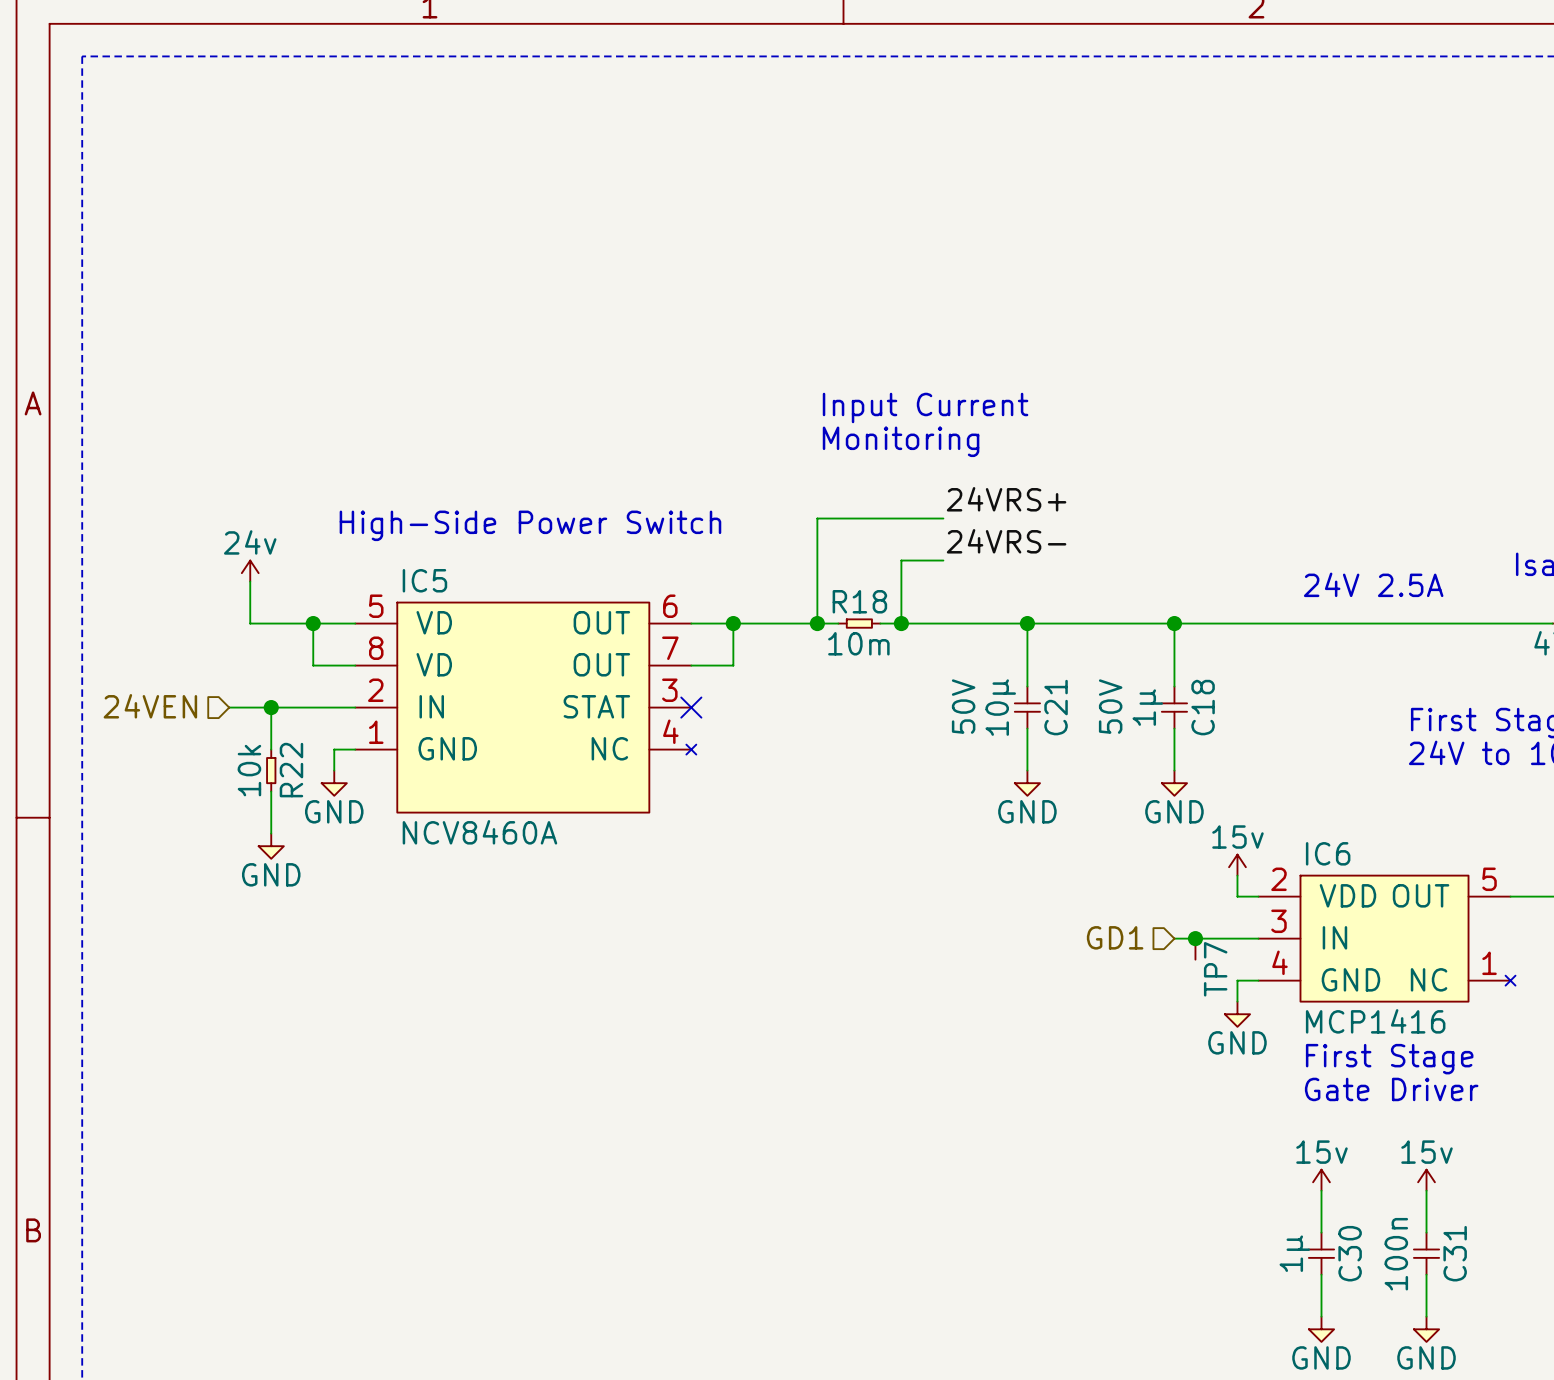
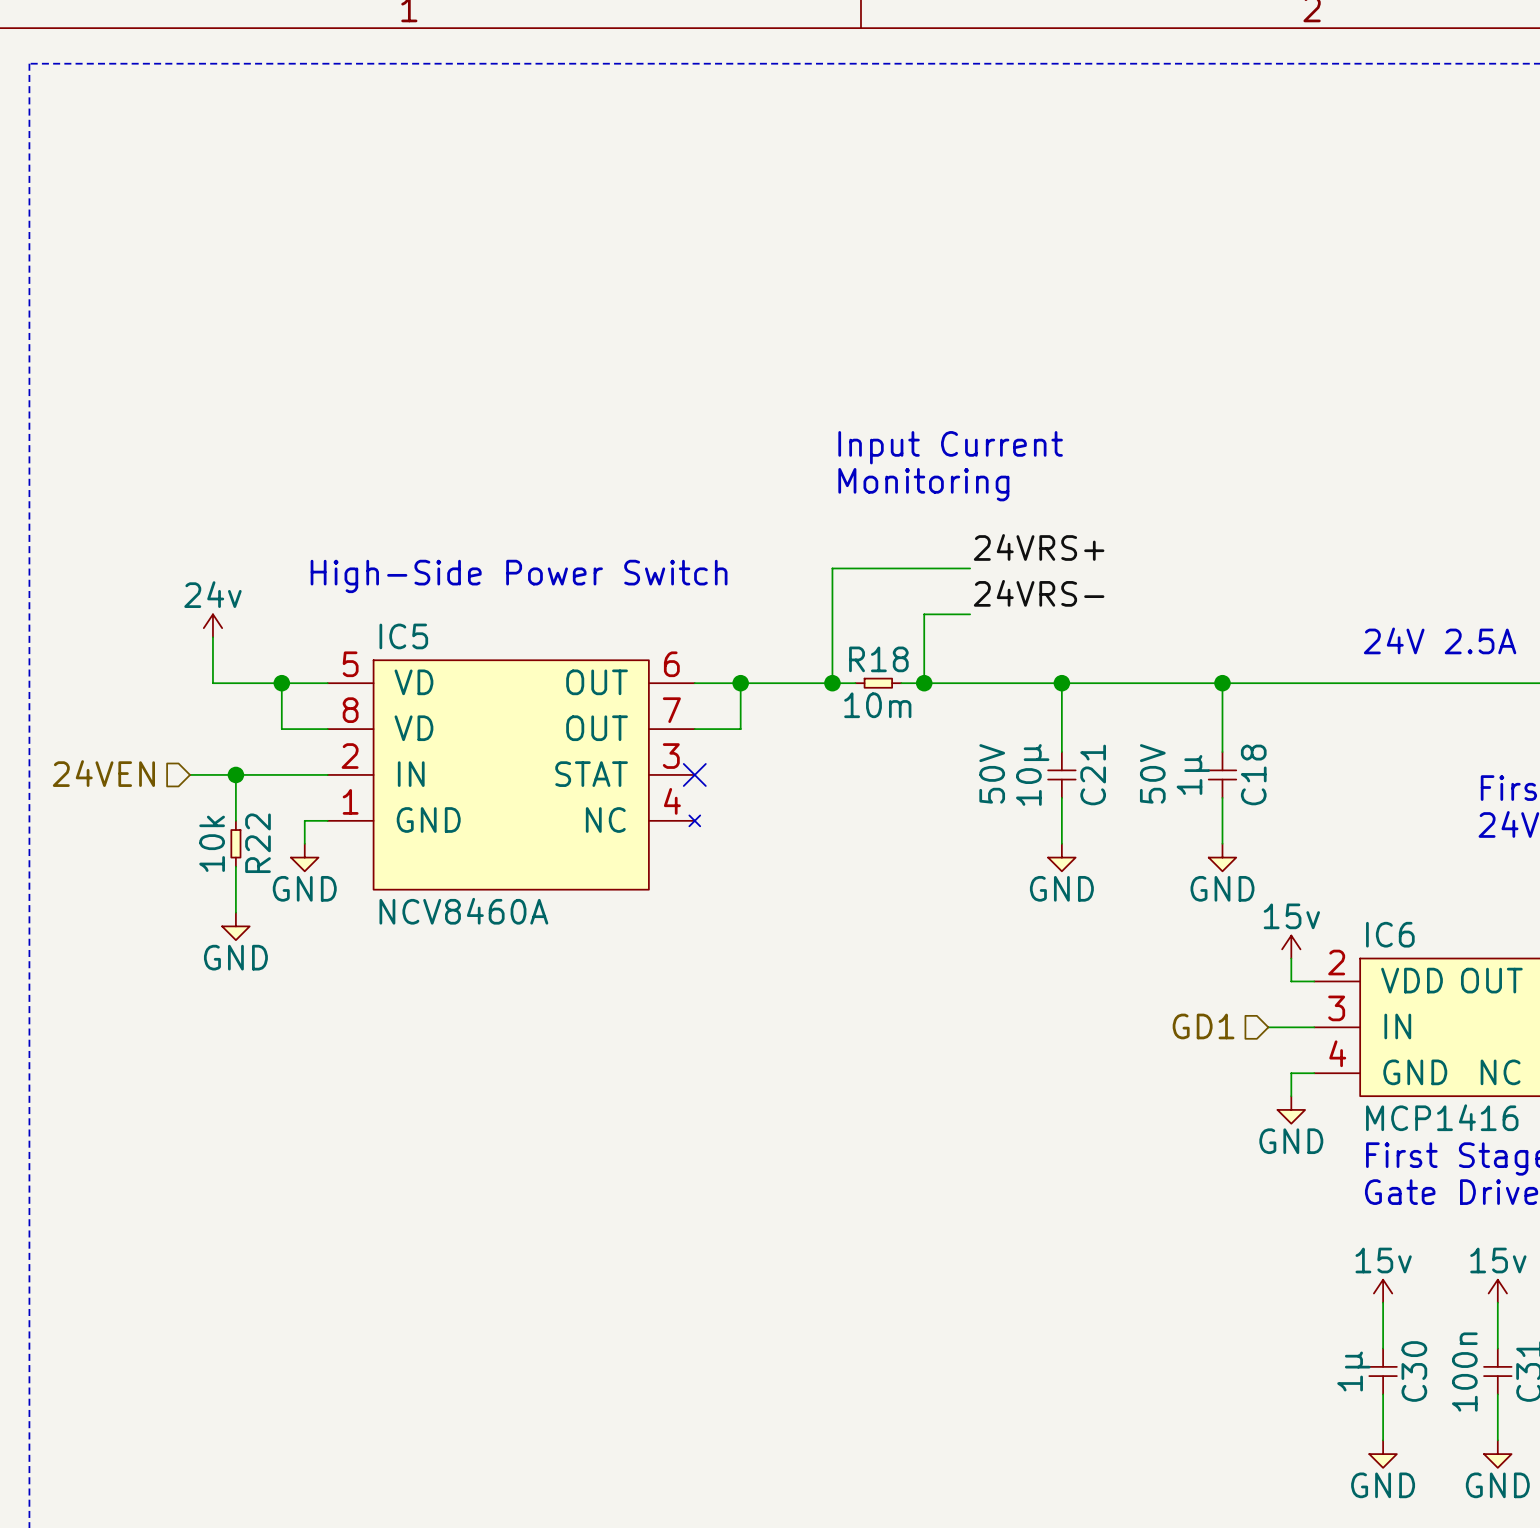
hierarchical label position: GD1 (1115, 937) -> GD1 (1203, 1026)
wire: (1174, 938) (1216, 938) -> none
junction: (1195, 938) -> none
TP7: (1195, 953) -> none

